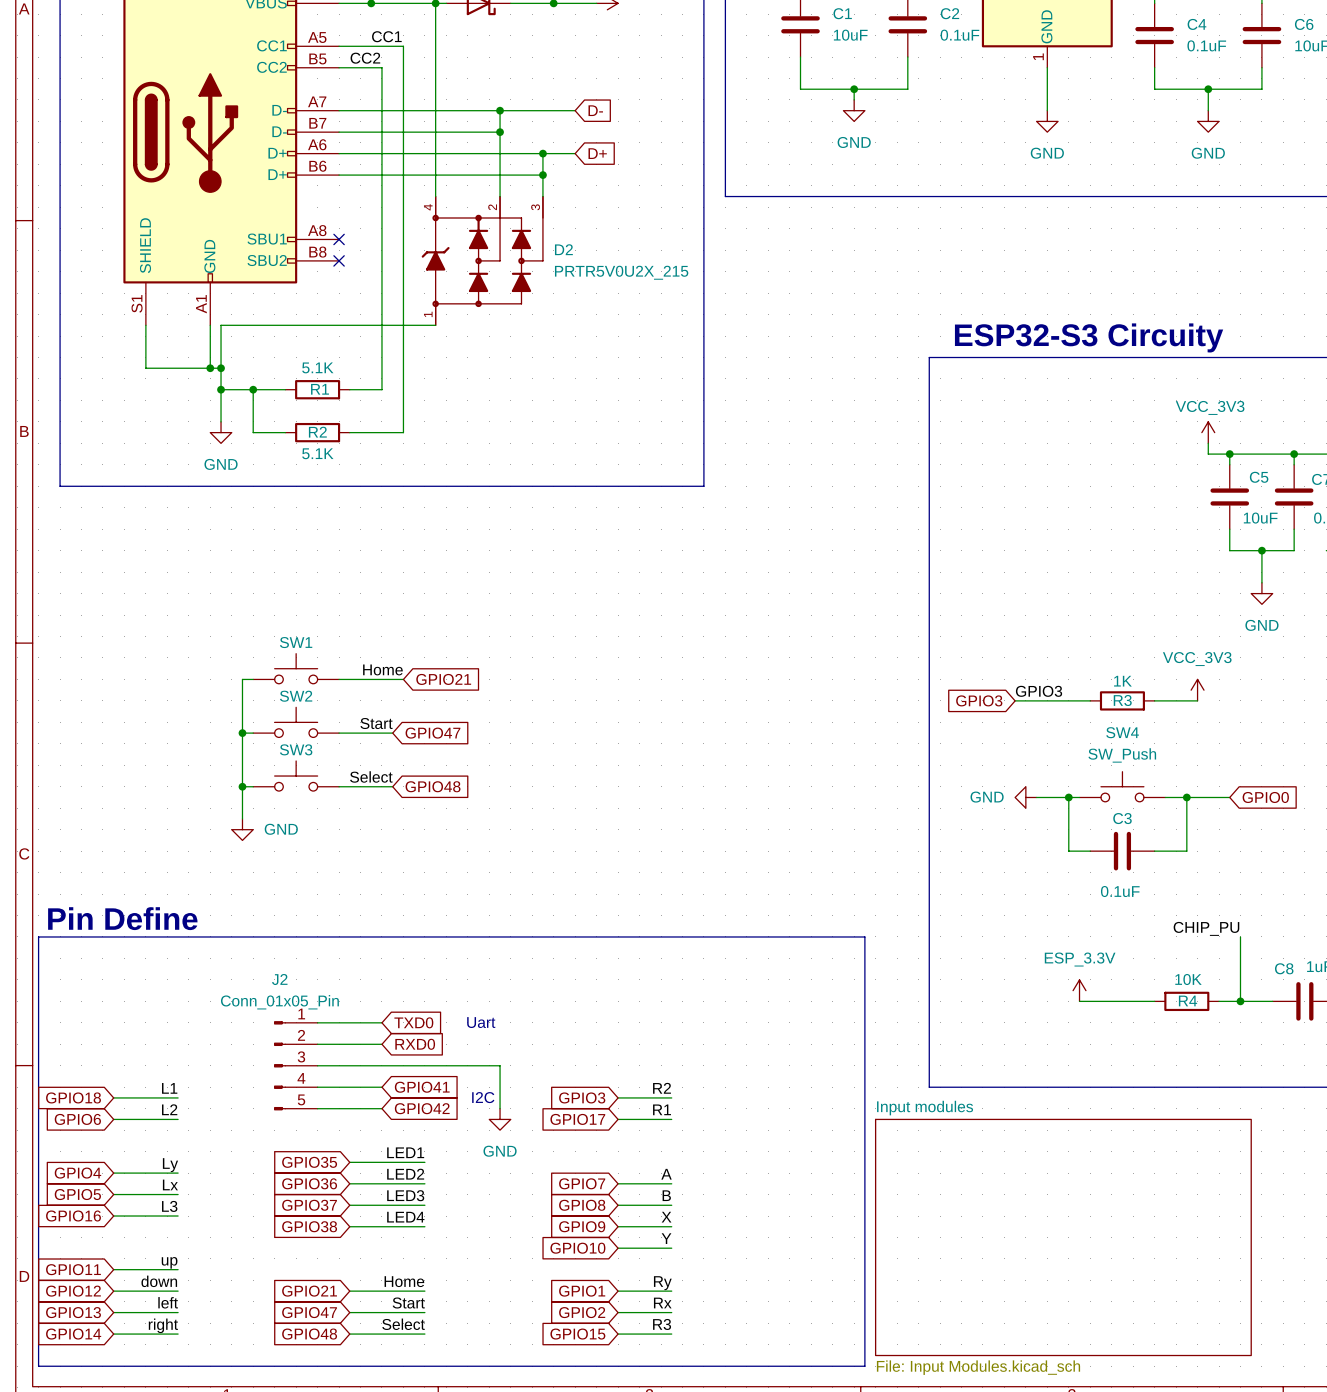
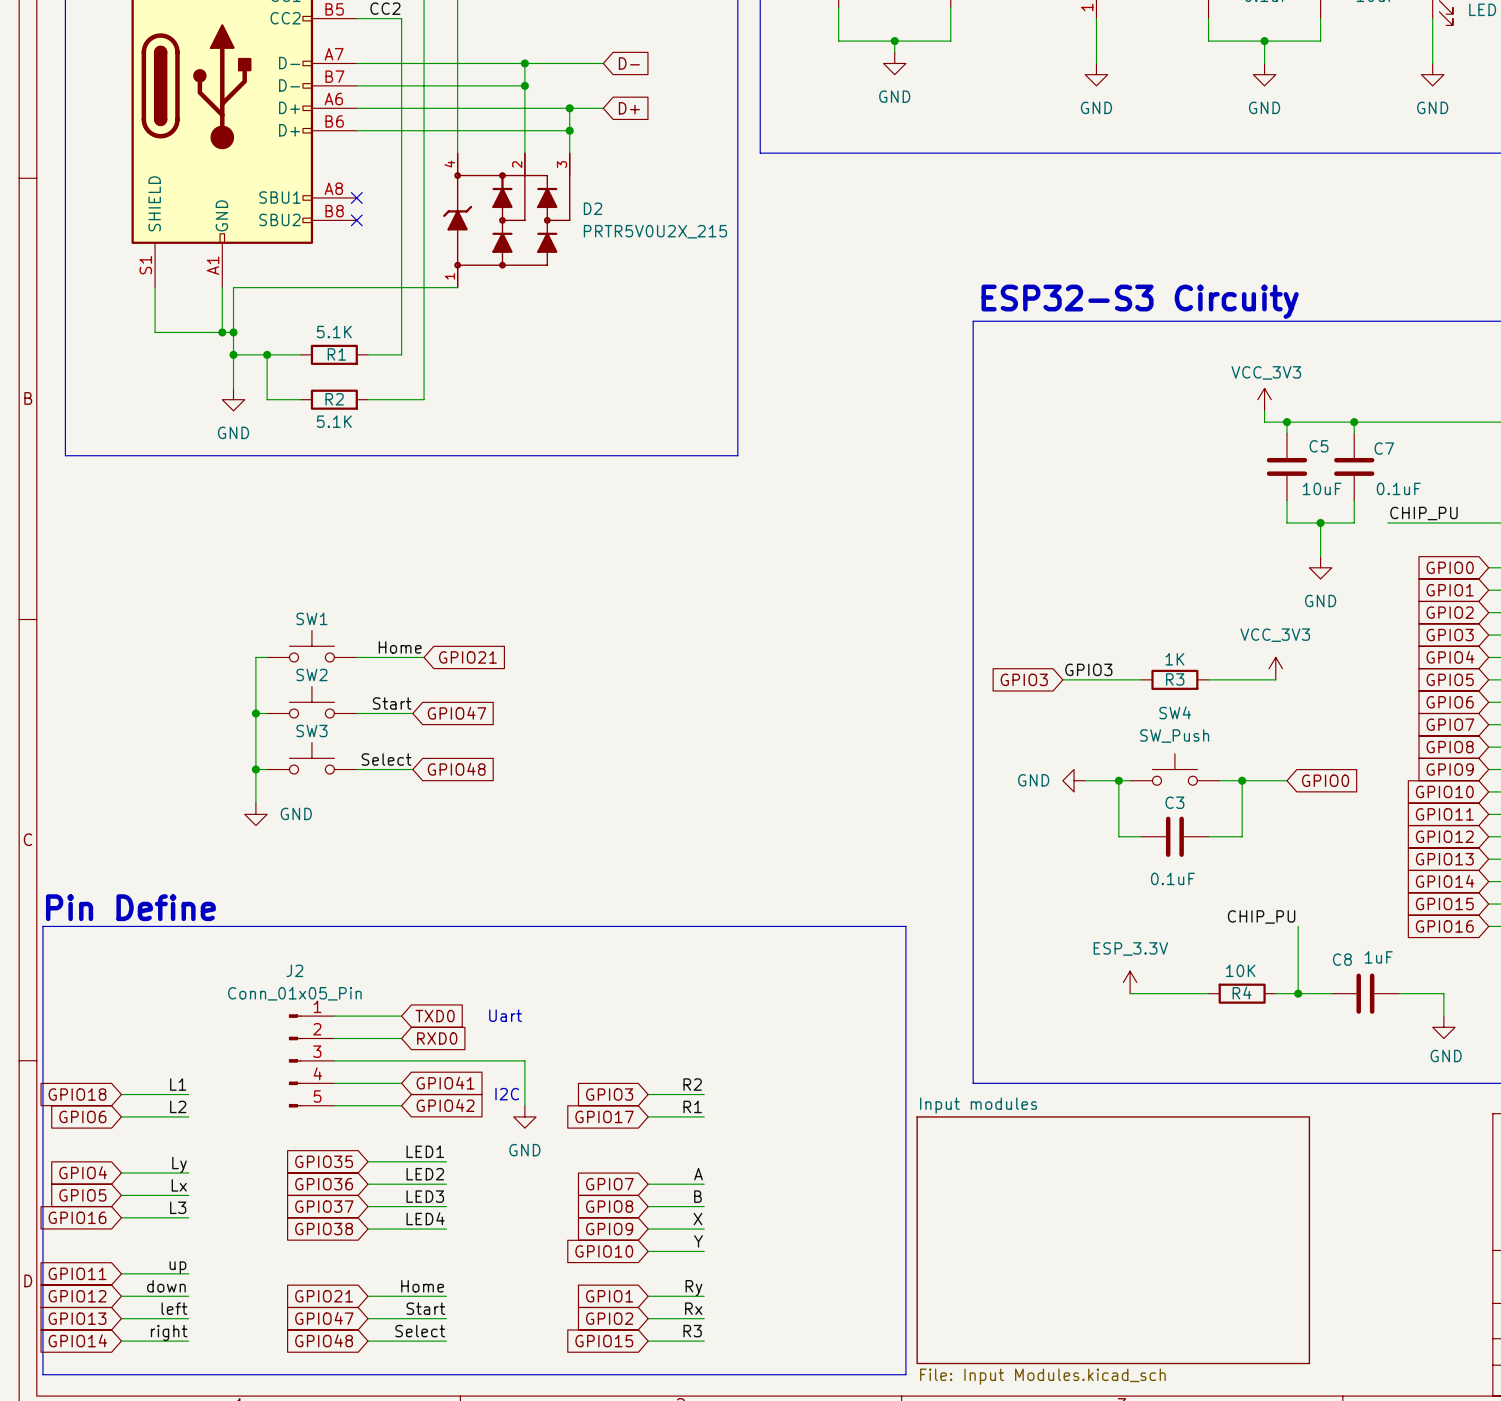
power symbol position: VCC_3V3 (1197, 690) -> VCC_3V3 (1275, 668)
wire: none -> (1253, 679) (1275, 679)

